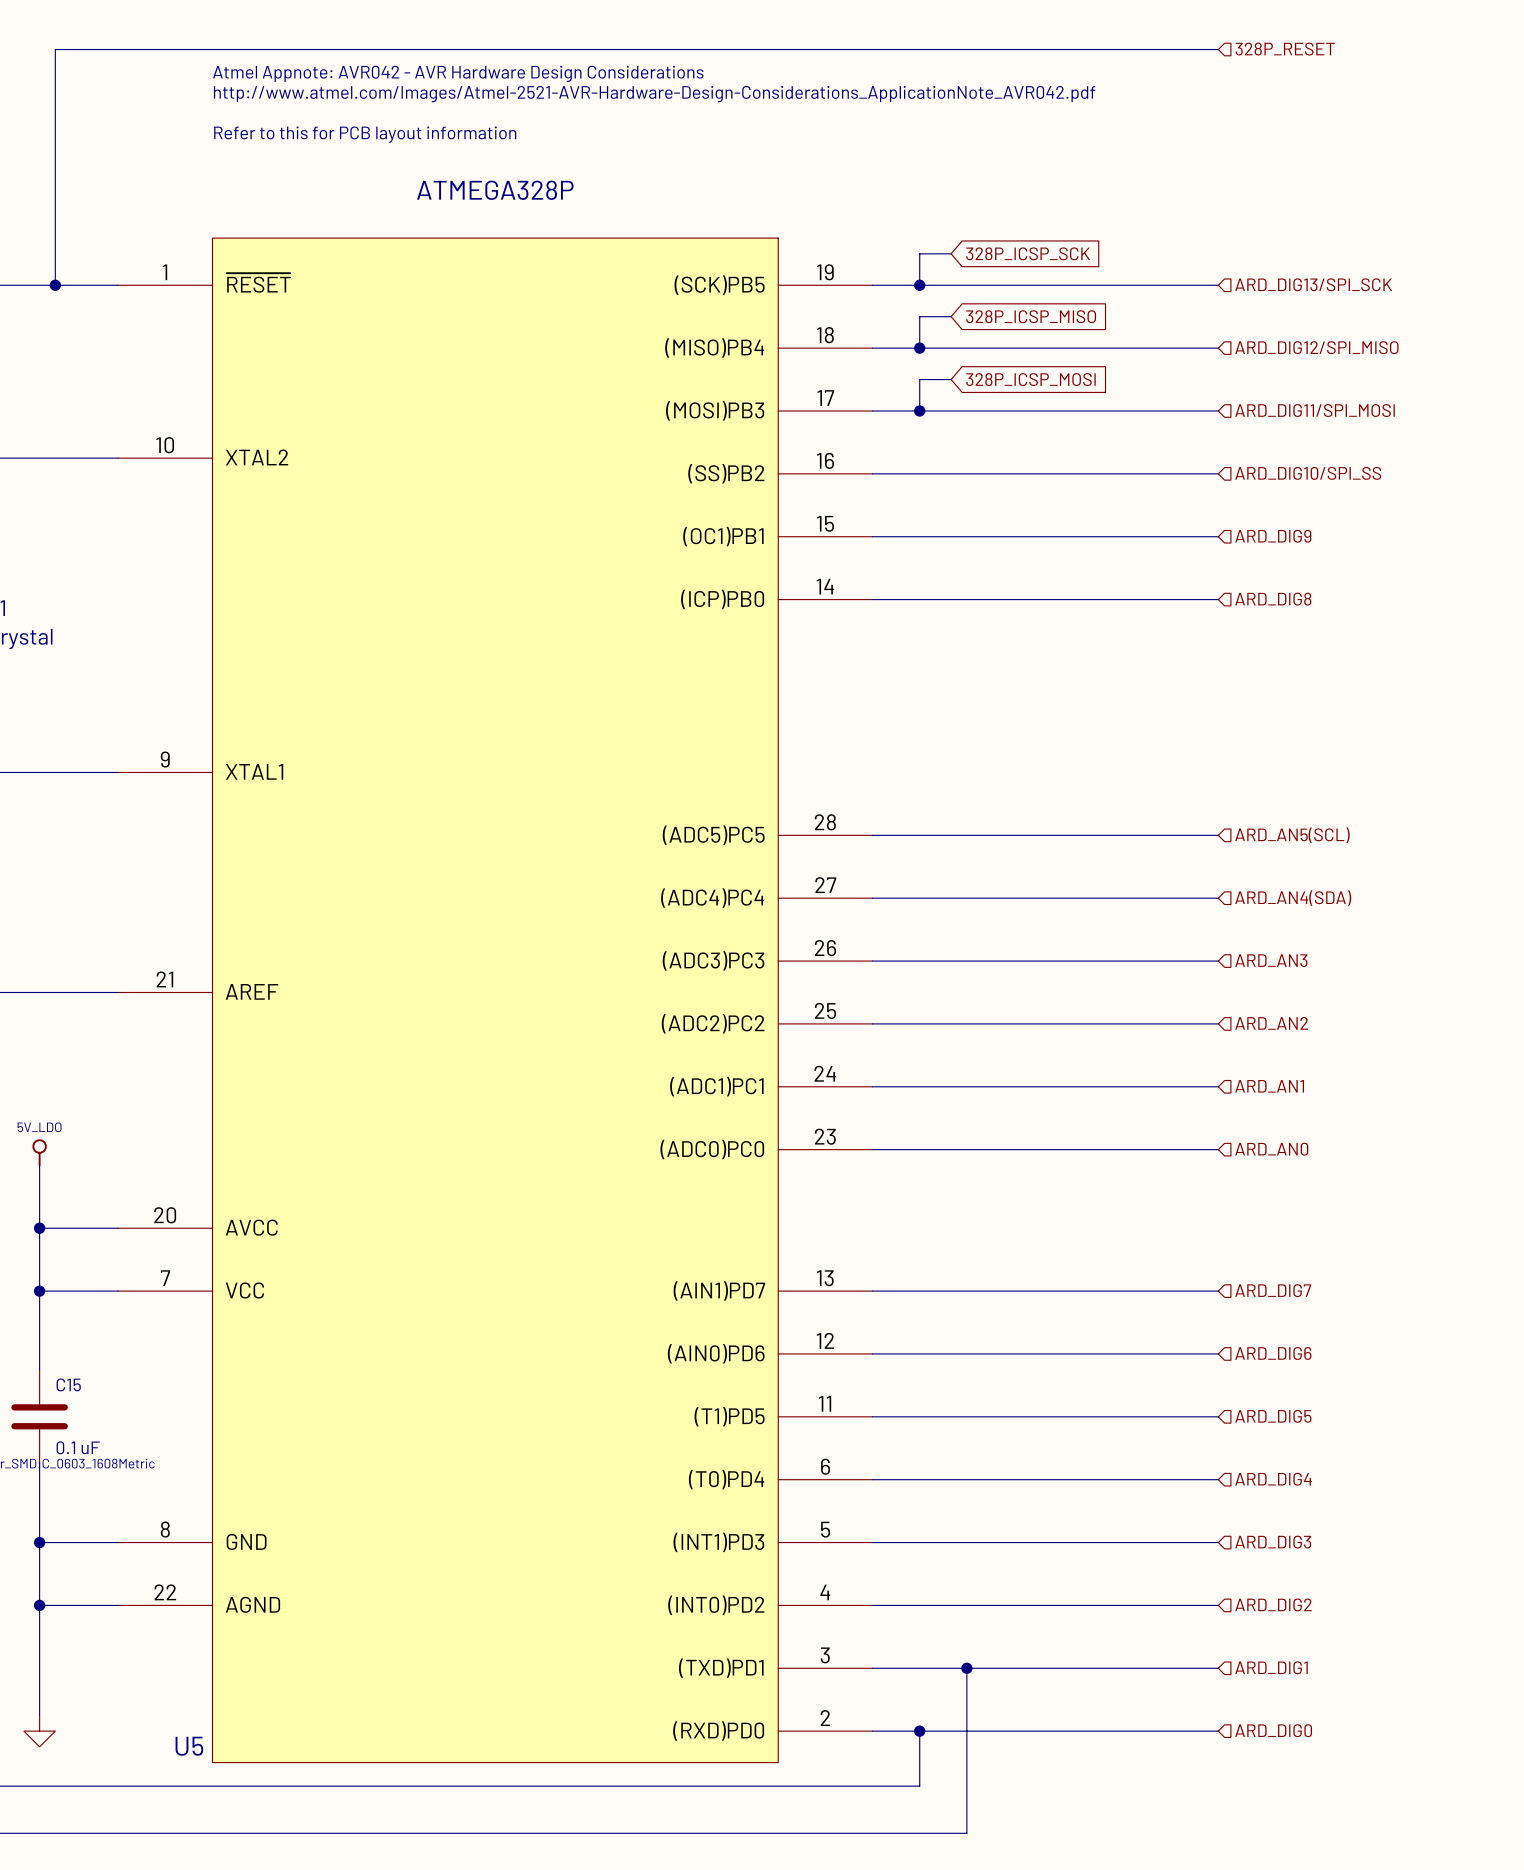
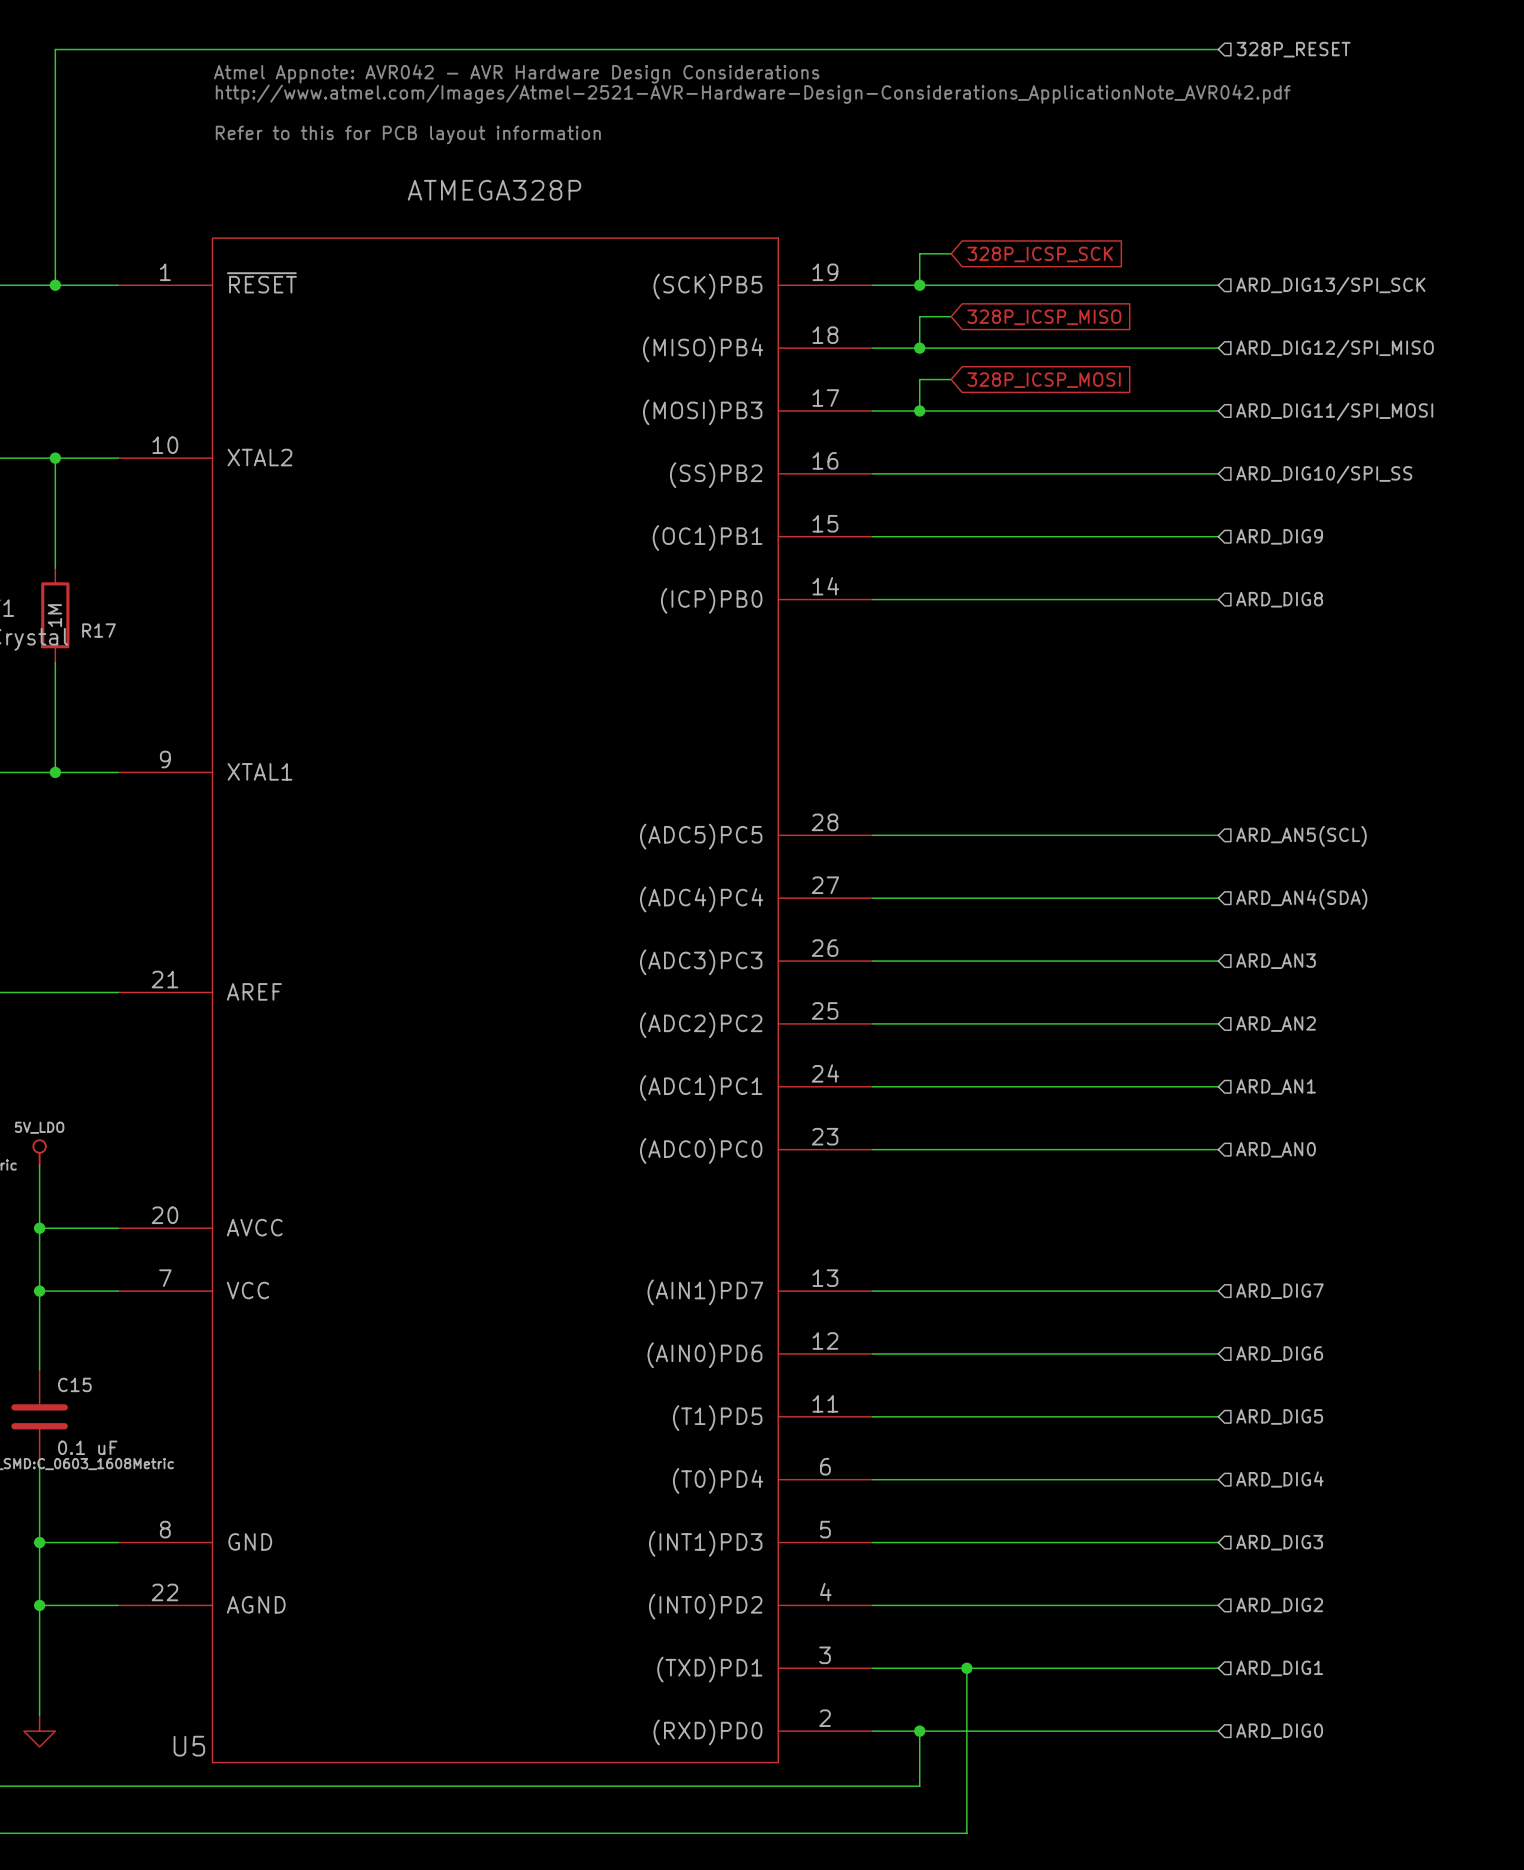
wire: none -> (55, 458) (55, 568)
junction: none -> (55, 458)
R17: none -> 1M (55, 615)
wire: none -> (55, 662) (55, 772)
junction: none -> (55, 772)

